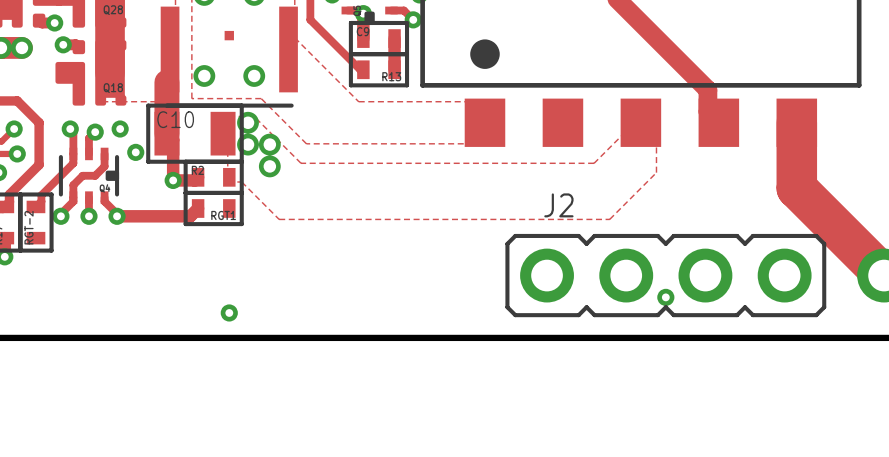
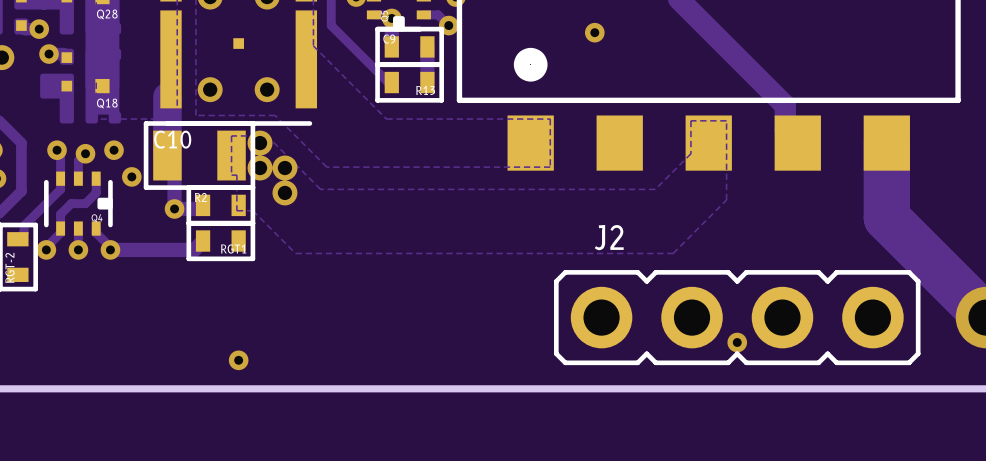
via: none -> (594, 32)

